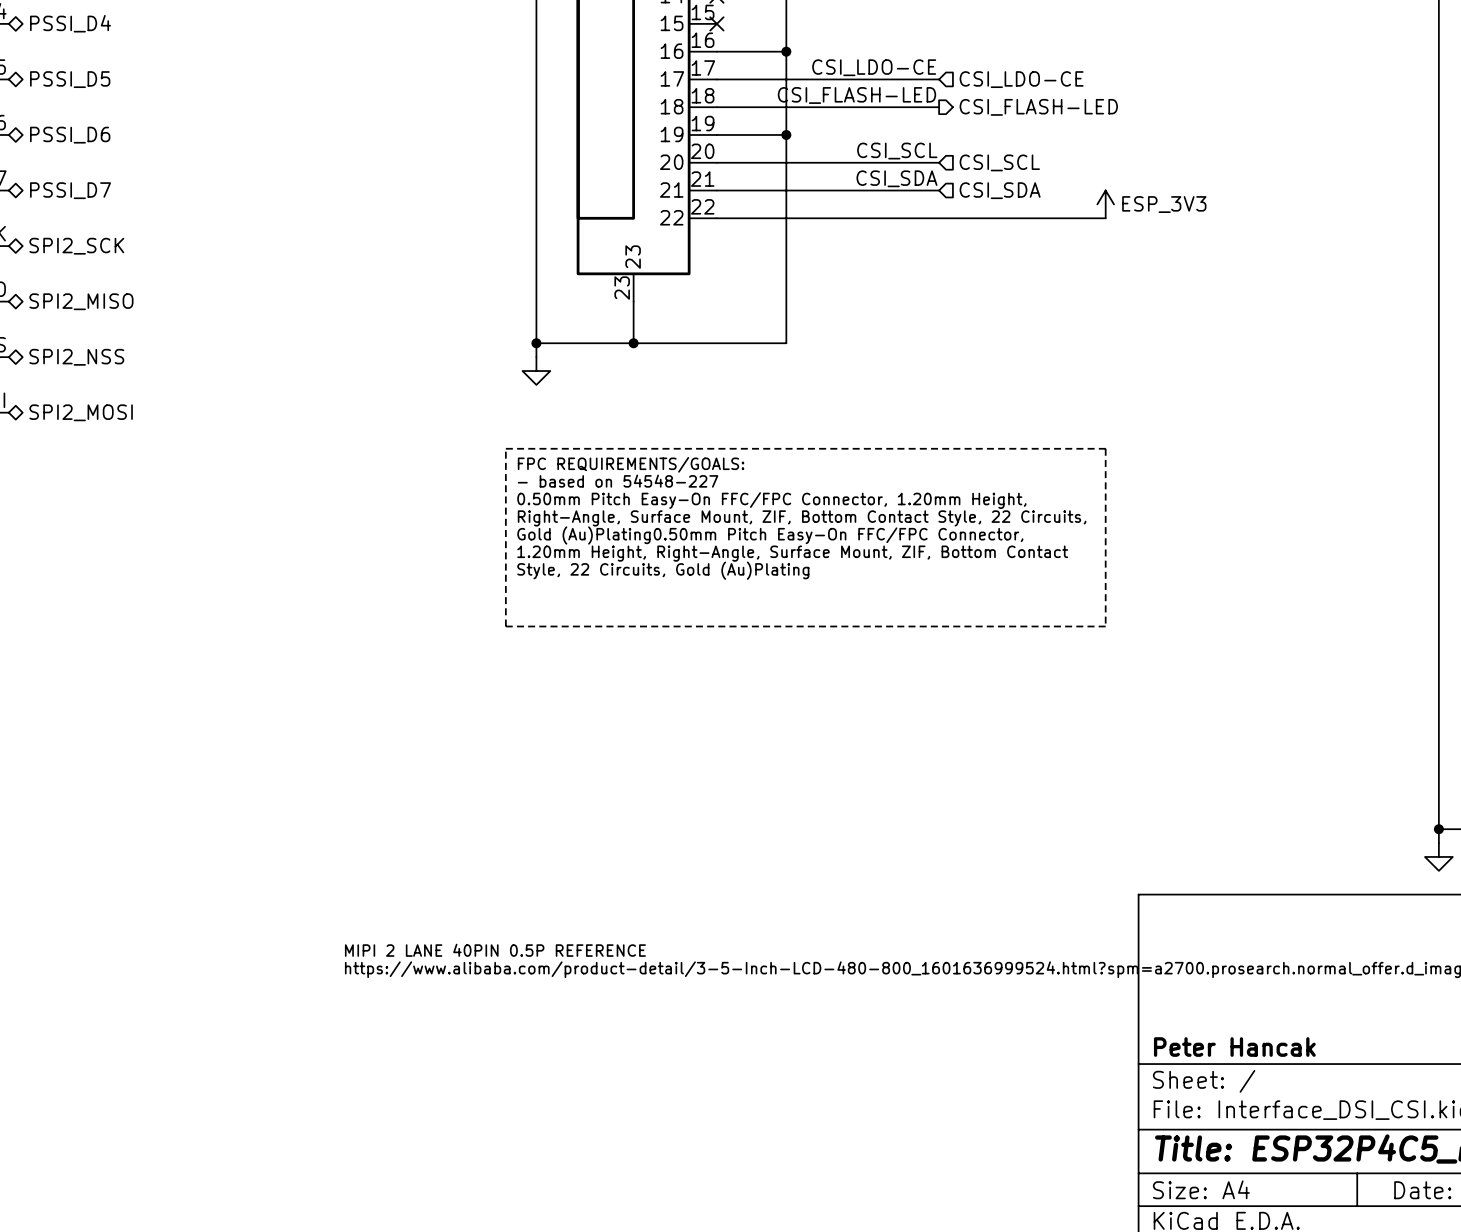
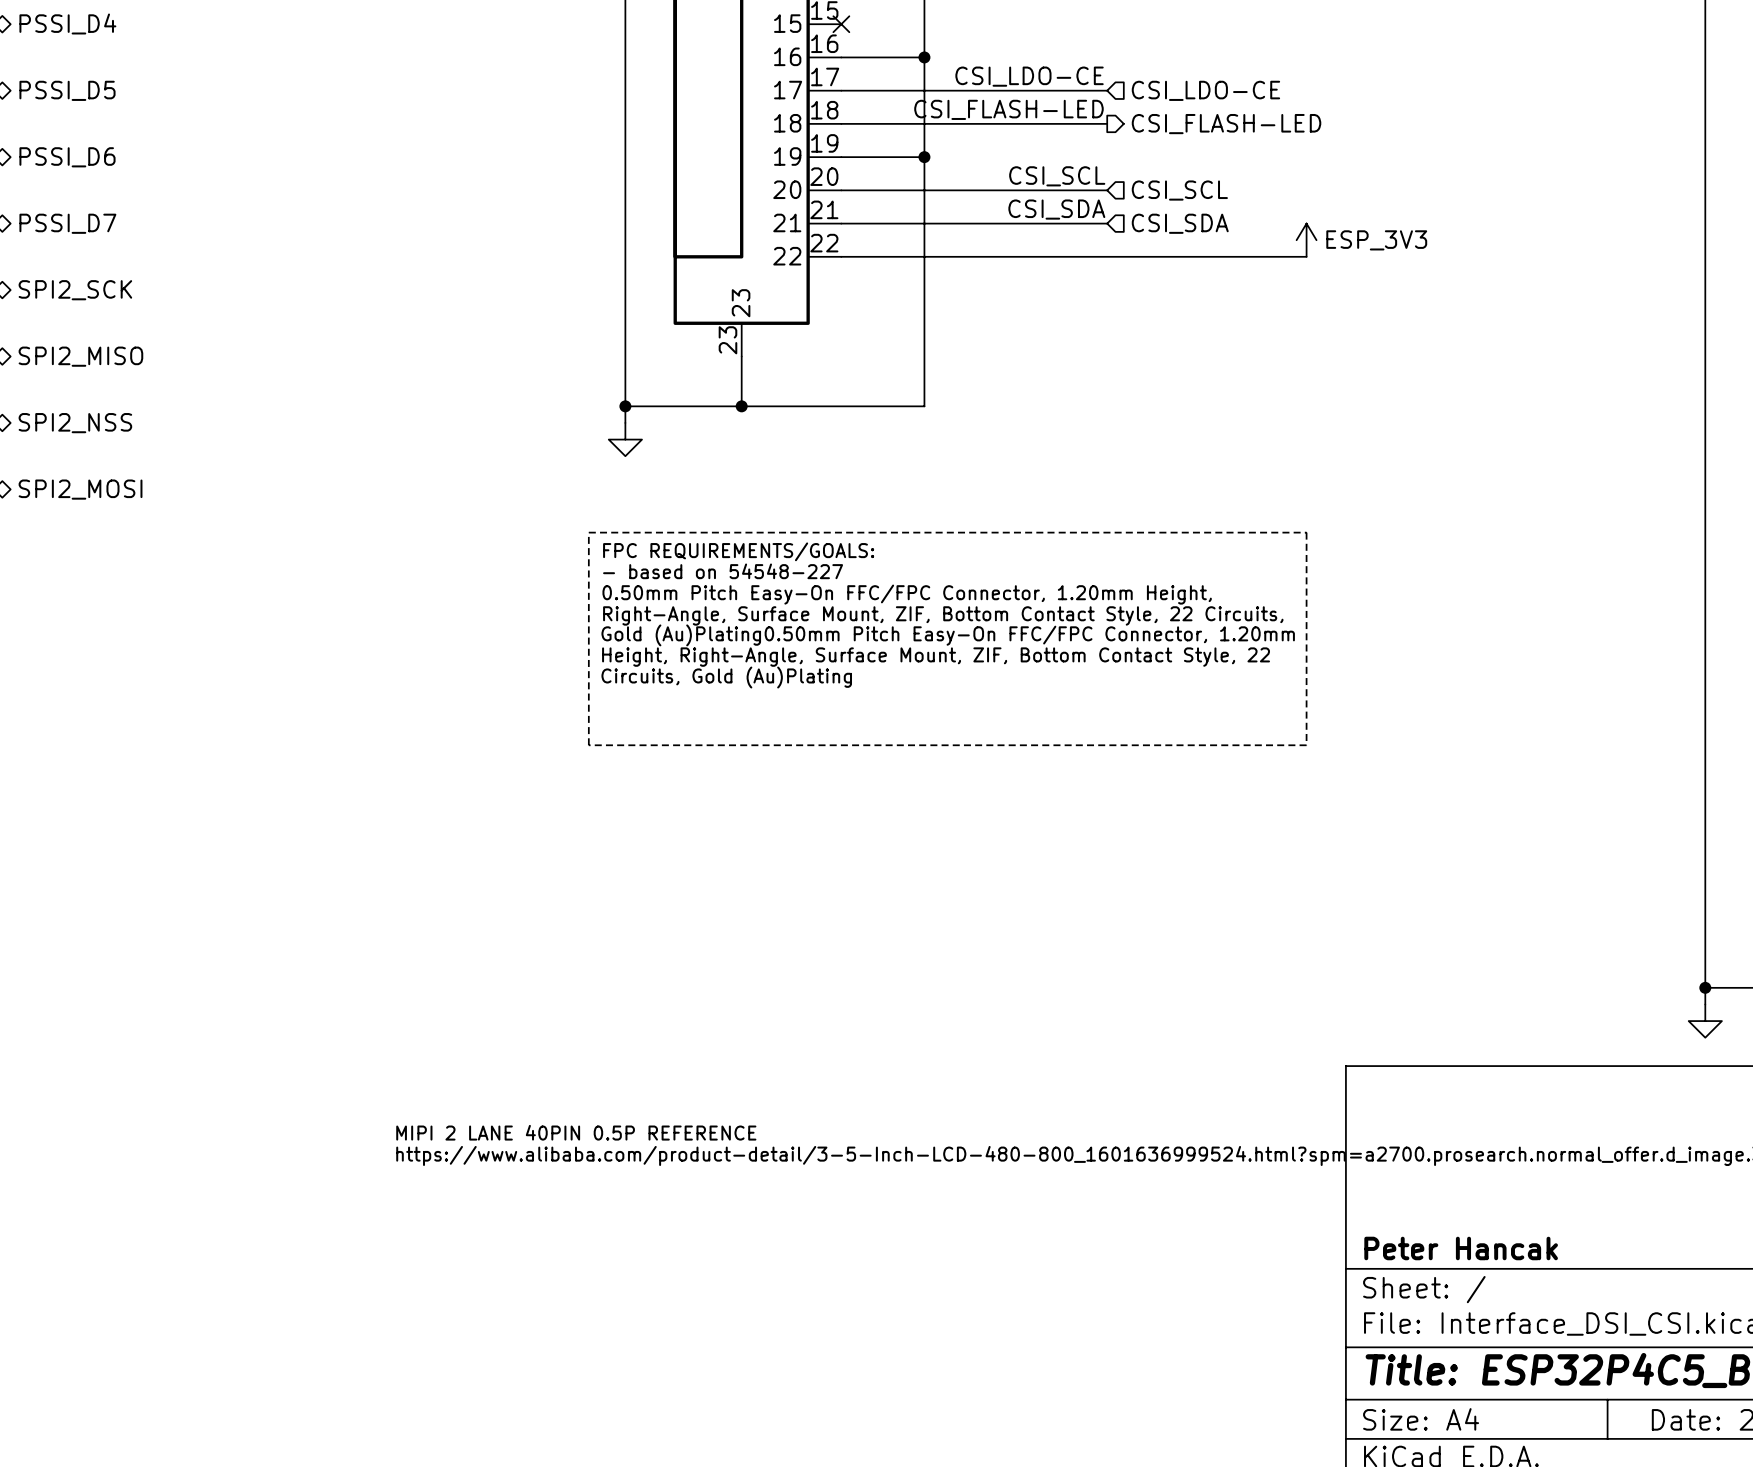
text: Gold (Au)Plating0.50mm Pitch Easy-On FFC/FPC Connector, (770, 535) -> Gold (Au)Plating0.50mm Pitch Easy-On FFC/FPC Connector, 1.20mm (948, 635)
text: 1.20mm Height, Right-Angle, Surface Mount, ZIF, Bottom Contact (792, 553) -> Height, Right-Angle, Surface Mount, ZIF, Bottom Contact Style, 22 (936, 657)
text: Style, 22 Circuits, Gold (Au)Plating (663, 570) -> Circuits, Gold (Au)Plating (726, 677)

